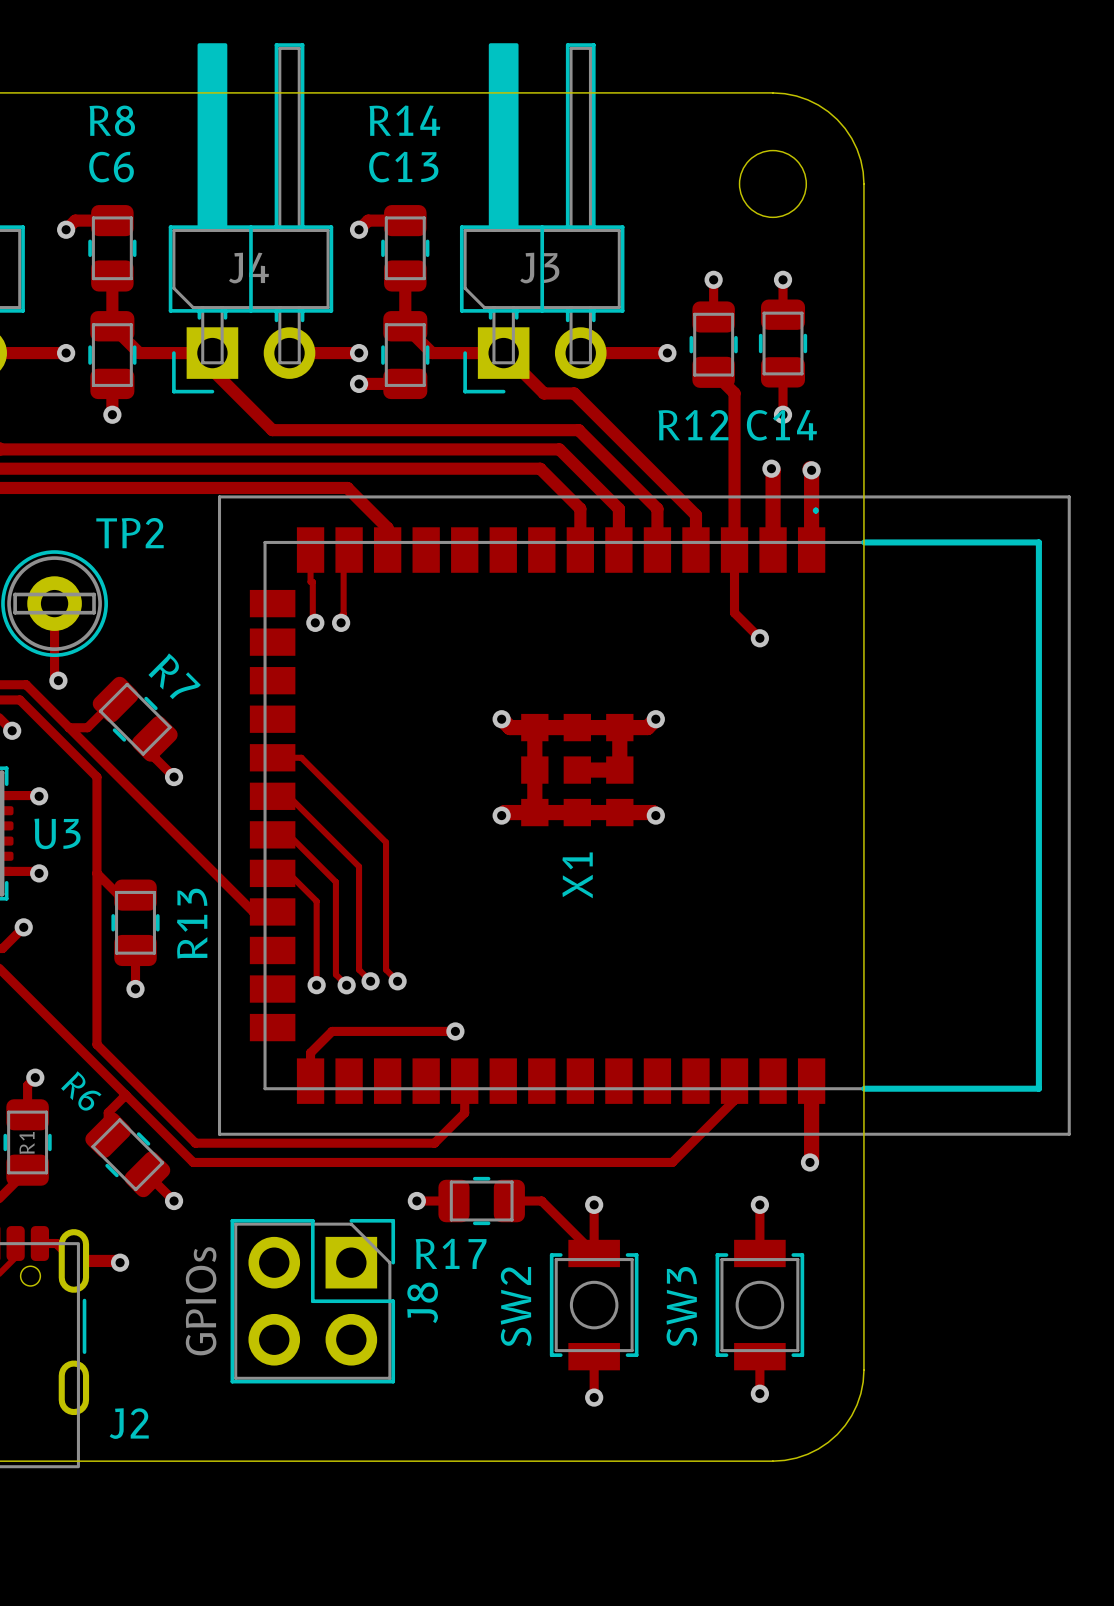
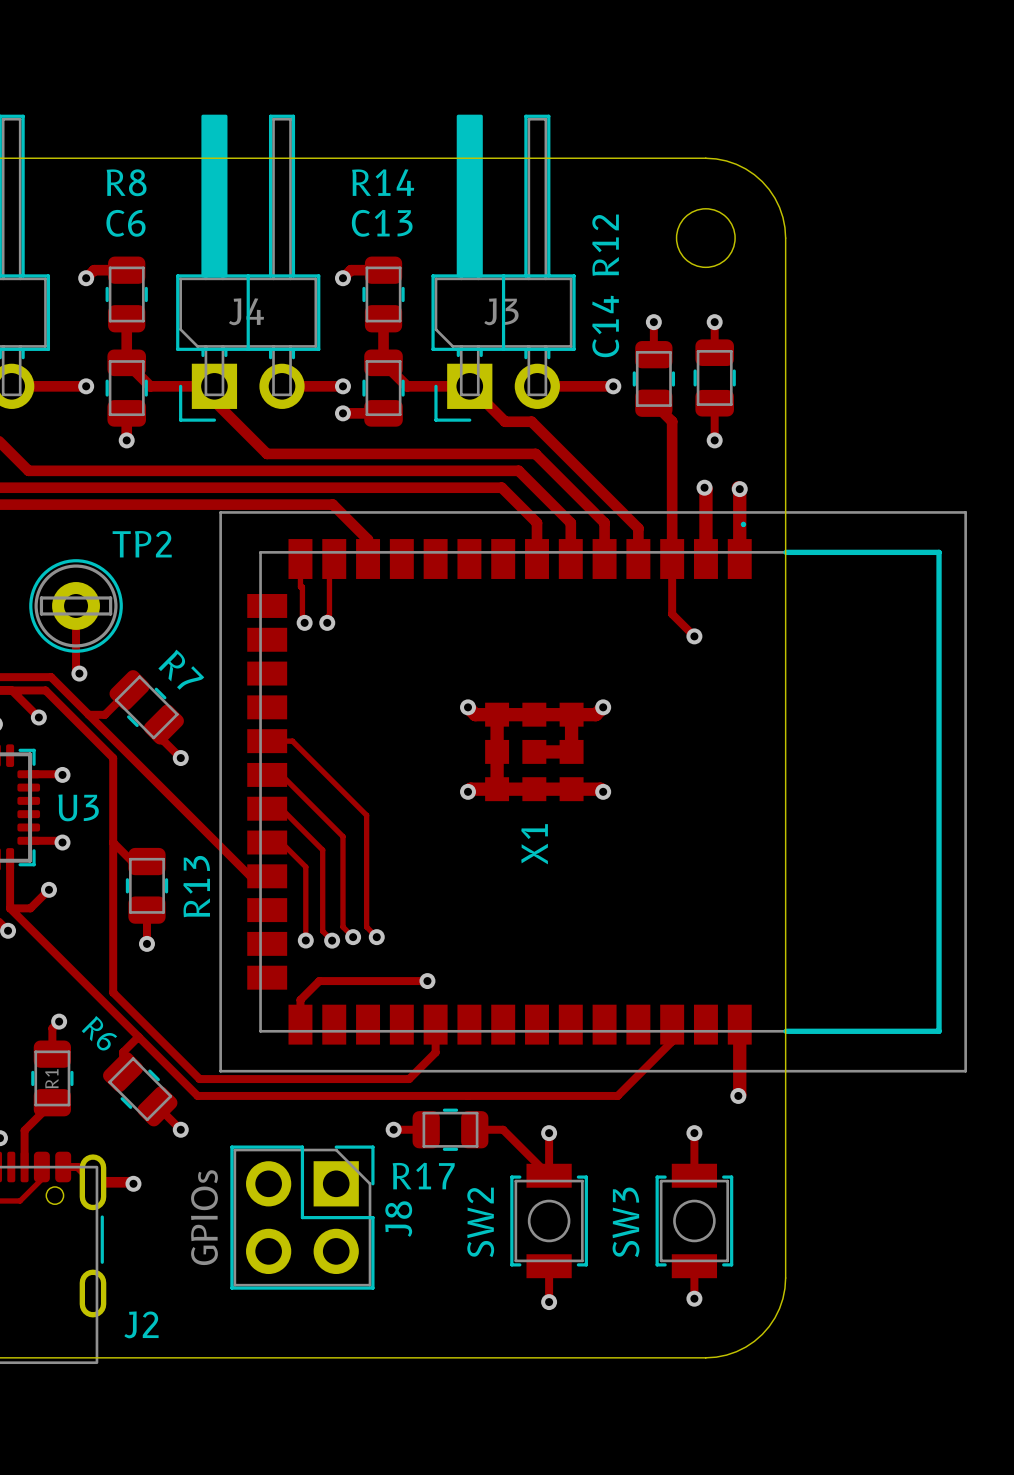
R12 name rotation: 0° (693, 425) -> 90° counterclockwise (605, 245)
R12 name position: R12 (693, 425) -> R12 (605, 245)
C14 name rotation: 0° (781, 425) -> 90° counterclockwise (605, 326)
C14 name position: C14 (781, 425) -> C14 (605, 326)

